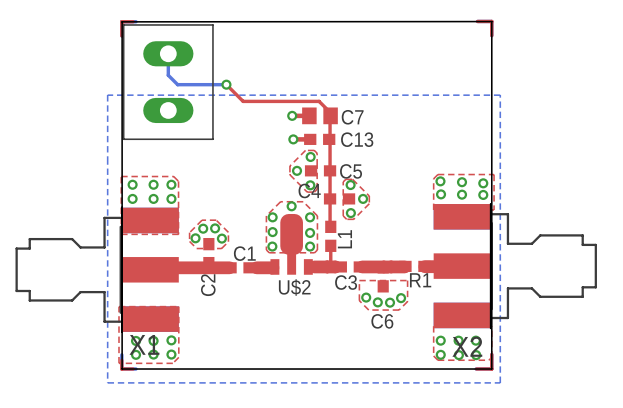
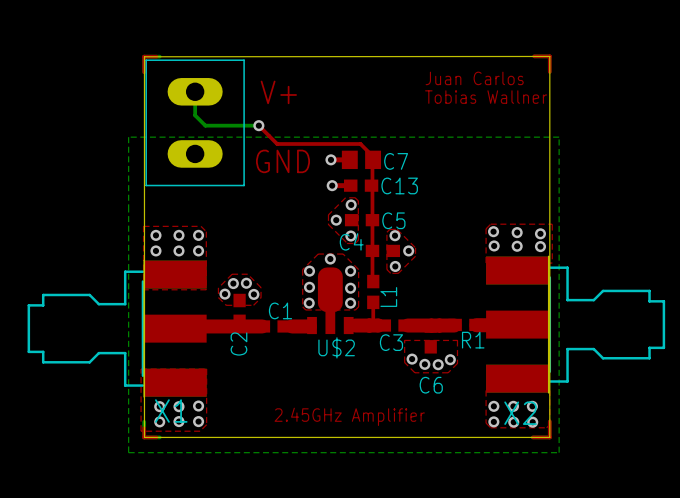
text: none -> Juan Carlos (474, 78)
text: none -> V+ (278, 92)
text: none -> Tobias Wallner (486, 97)
text: none -> GND (283, 161)
text: none -> 2.45GHz Amplifier (349, 416)

